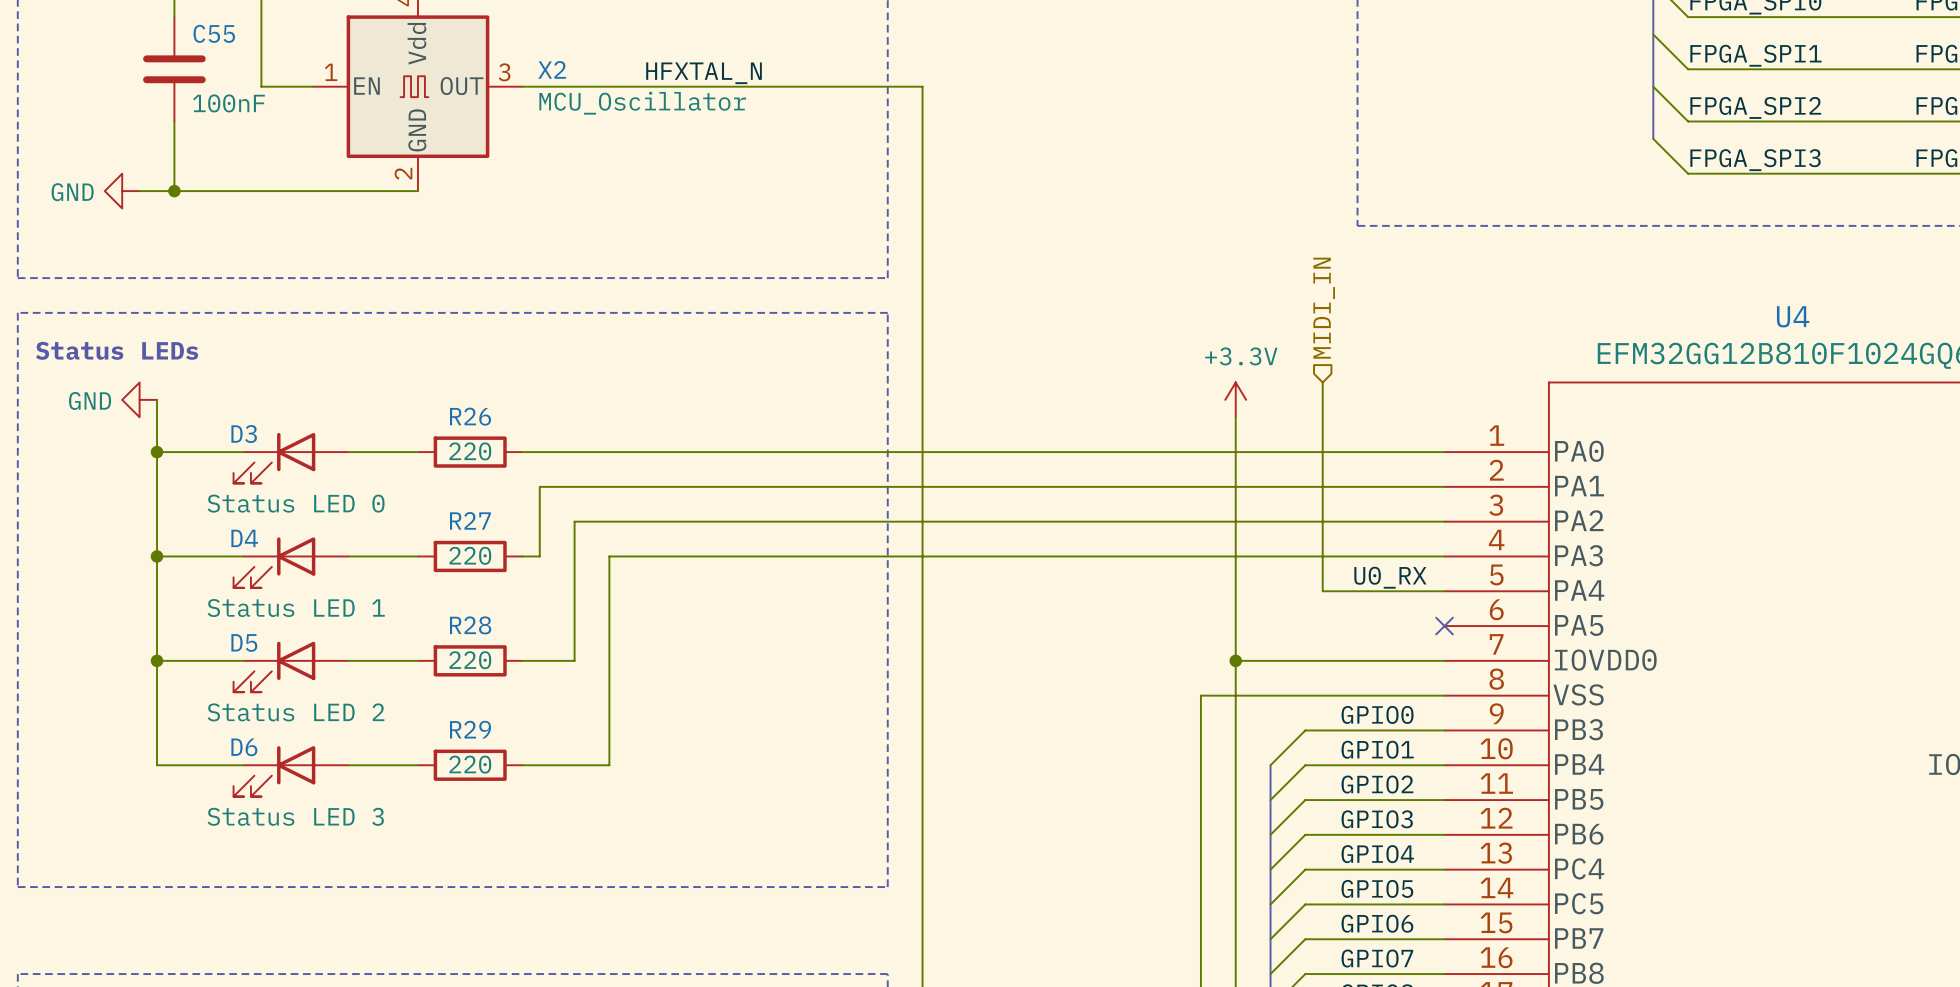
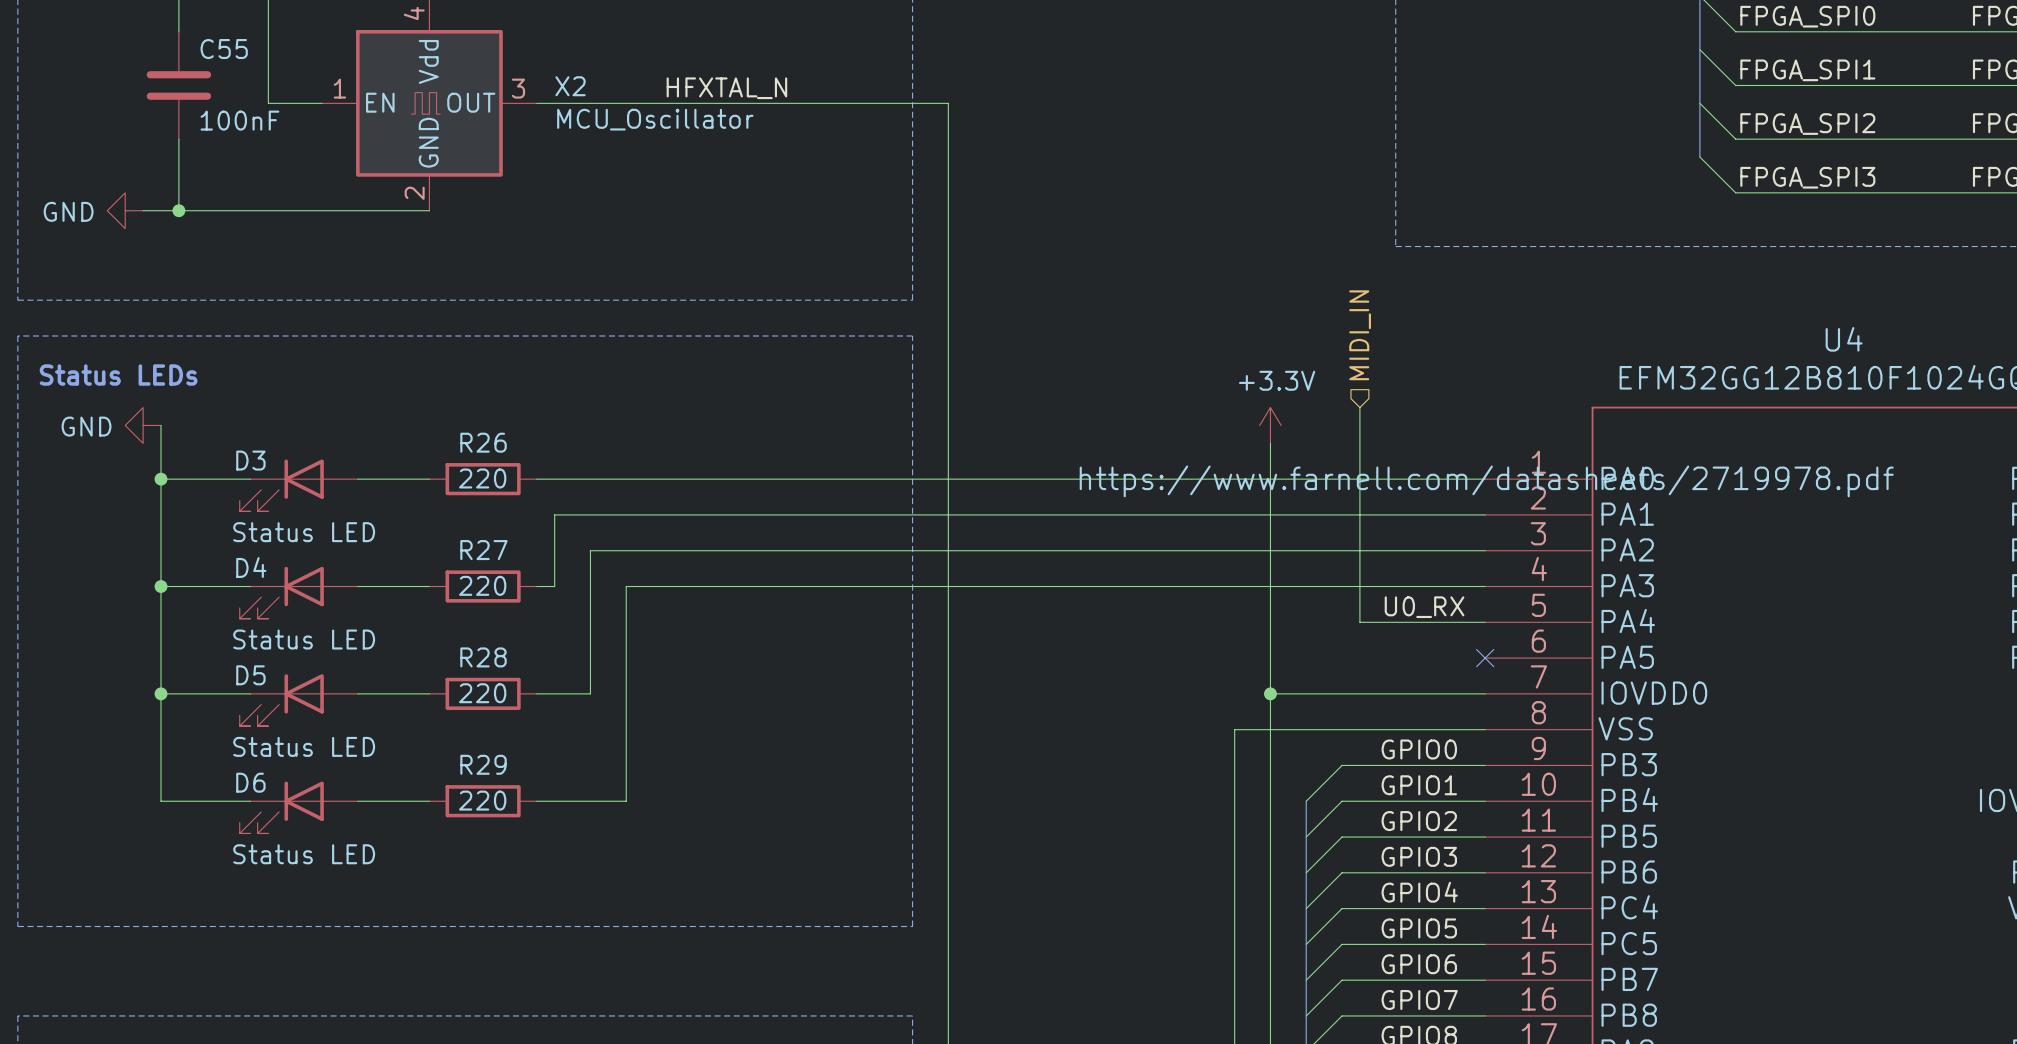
U4 text: none -> https://www.farnell.com/datasheets/2719978.pdf (1486, 481)
D3 value: Status LED 0 (296, 503) -> Status LED (304, 532)
D4 value: Status LED 1 (296, 608) -> Status LED (304, 639)
D5 value: Status LED 2 (295, 712) -> Status LED (304, 746)
D6 value: Status LED 3 (295, 816) -> Status LED (304, 854)

